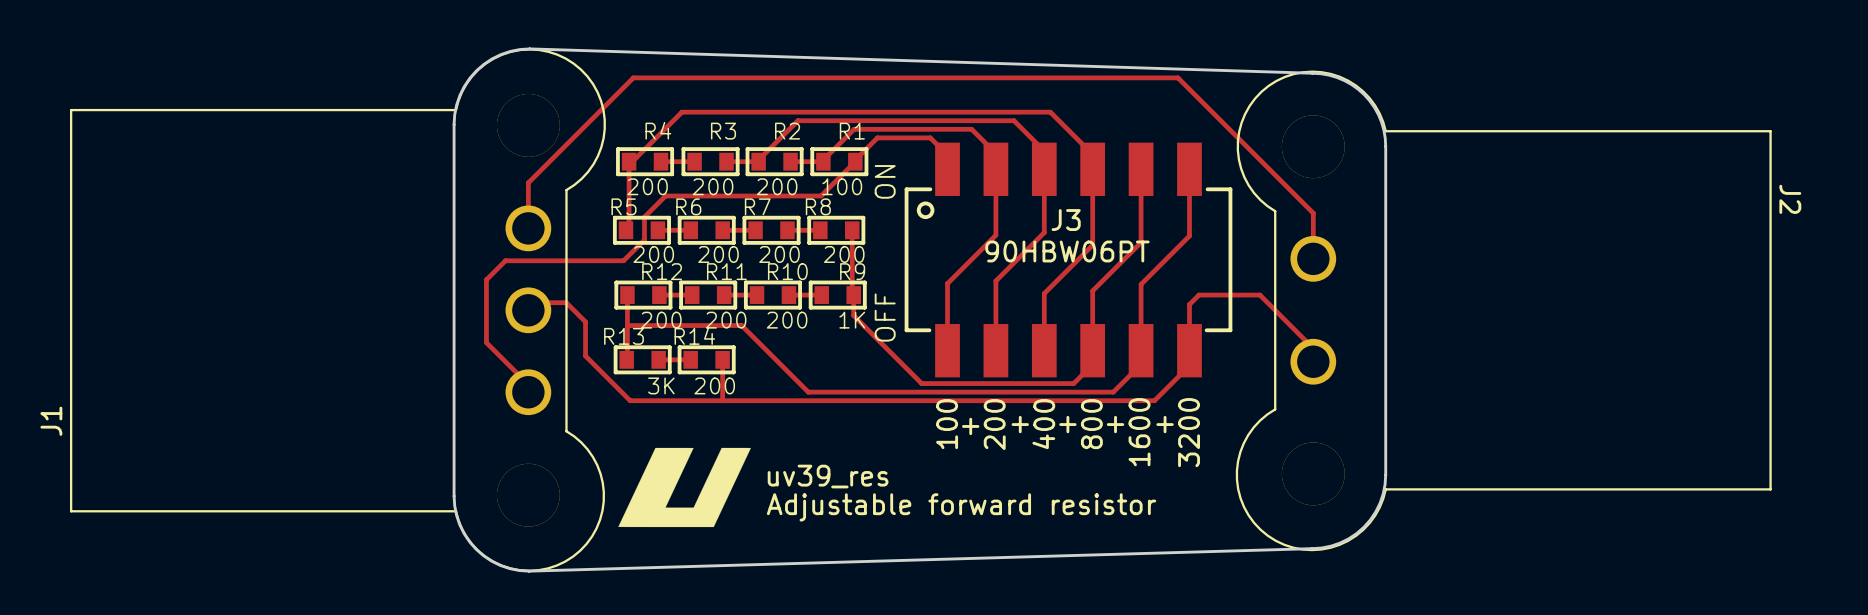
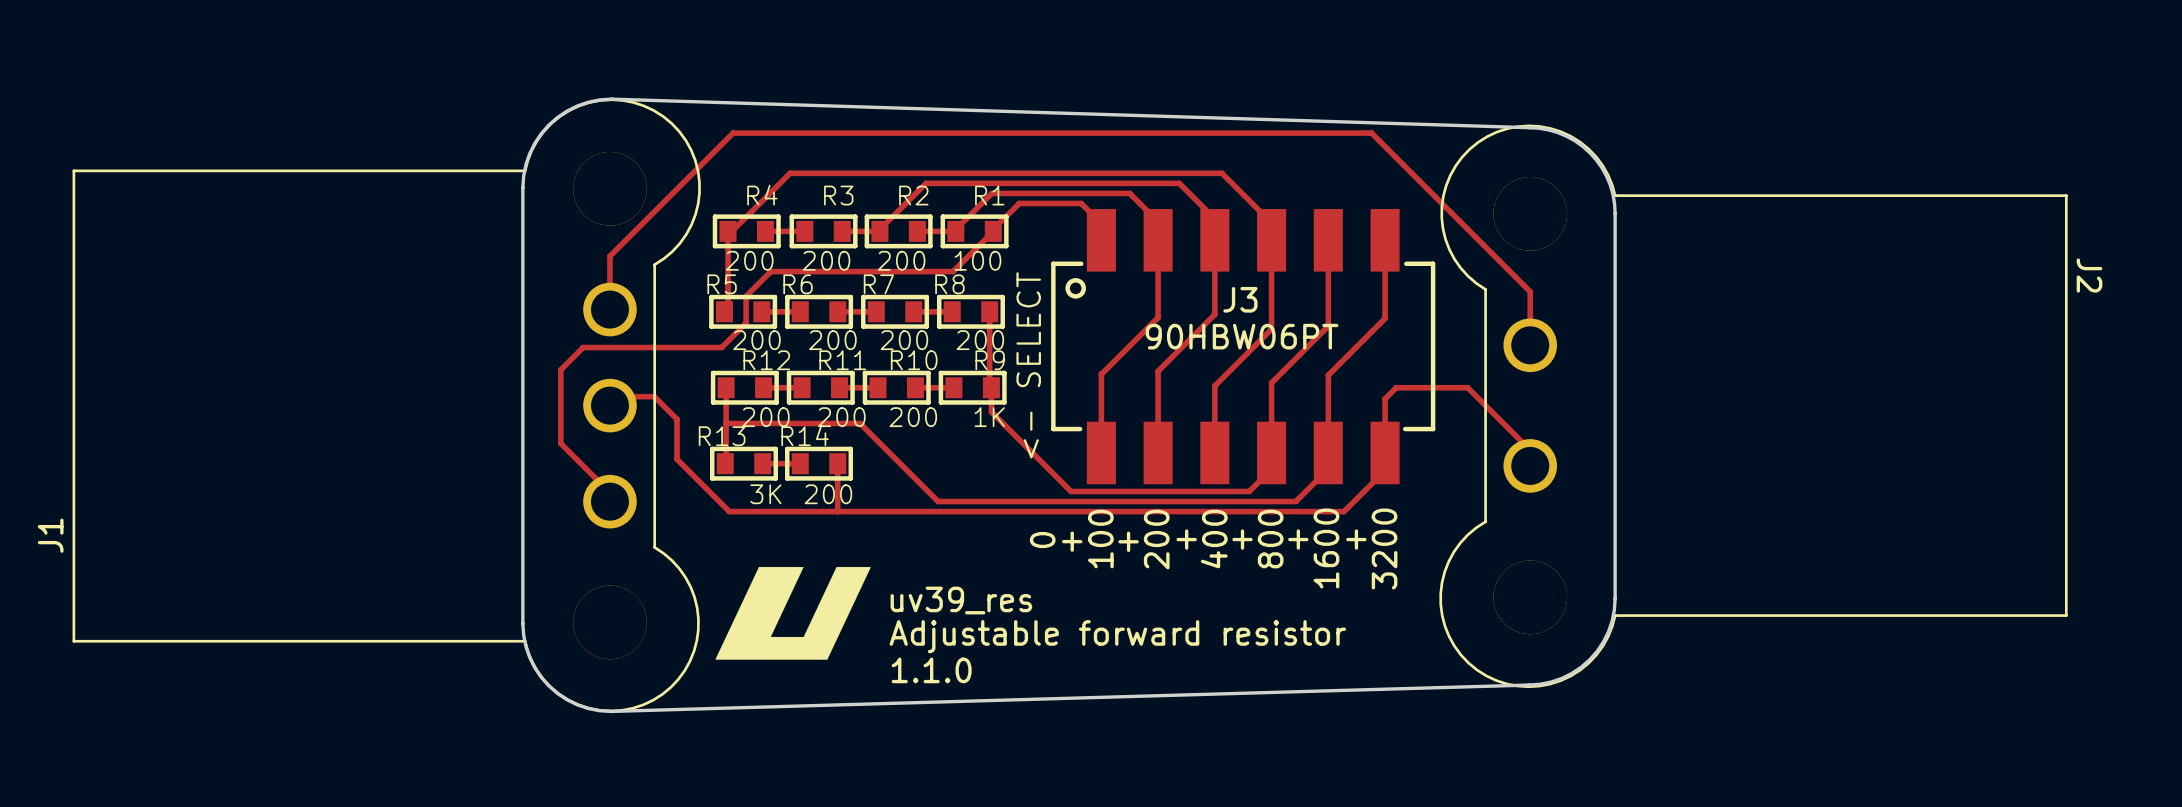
J3 text: ON (885, 181) -> none
J3 text: none -> <- SELECT (1028, 365)
J3 text: OFF (885, 317) -> none
text: none -> 0 (1042, 540)
text: none -> + (1072, 541)
text: none -> 1.1.0 (931, 670)

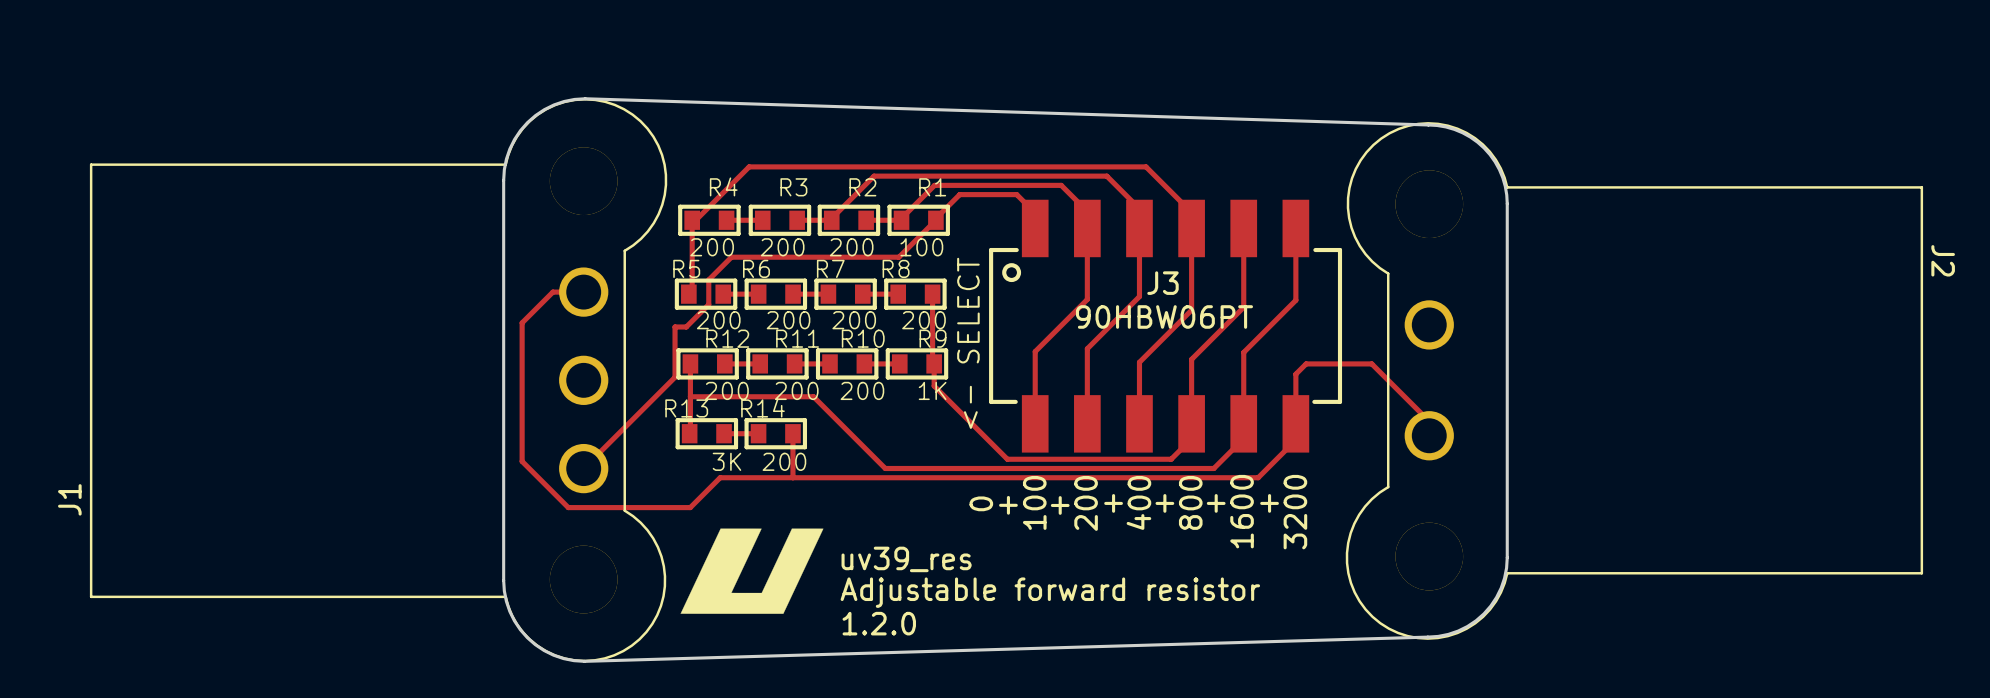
top track: (609, 300) (609, 256) (733, 133) (1371, 133) (1530, 291) (1530, 345) -> none
top track: (709, 347) (583, 347) (560, 369) (560, 443) (609, 492) -> (675, 326) (675, 377) (583, 468)
top track: (609, 396) (654, 396) (676, 419) (676, 459) (729, 511) (758, 511) -> (583, 292) (552, 292) (522, 322) (522, 461) (568, 507) (690, 507) (720, 477)
text: 1.1.0 (931, 670) -> 1.2.0 (879, 623)

